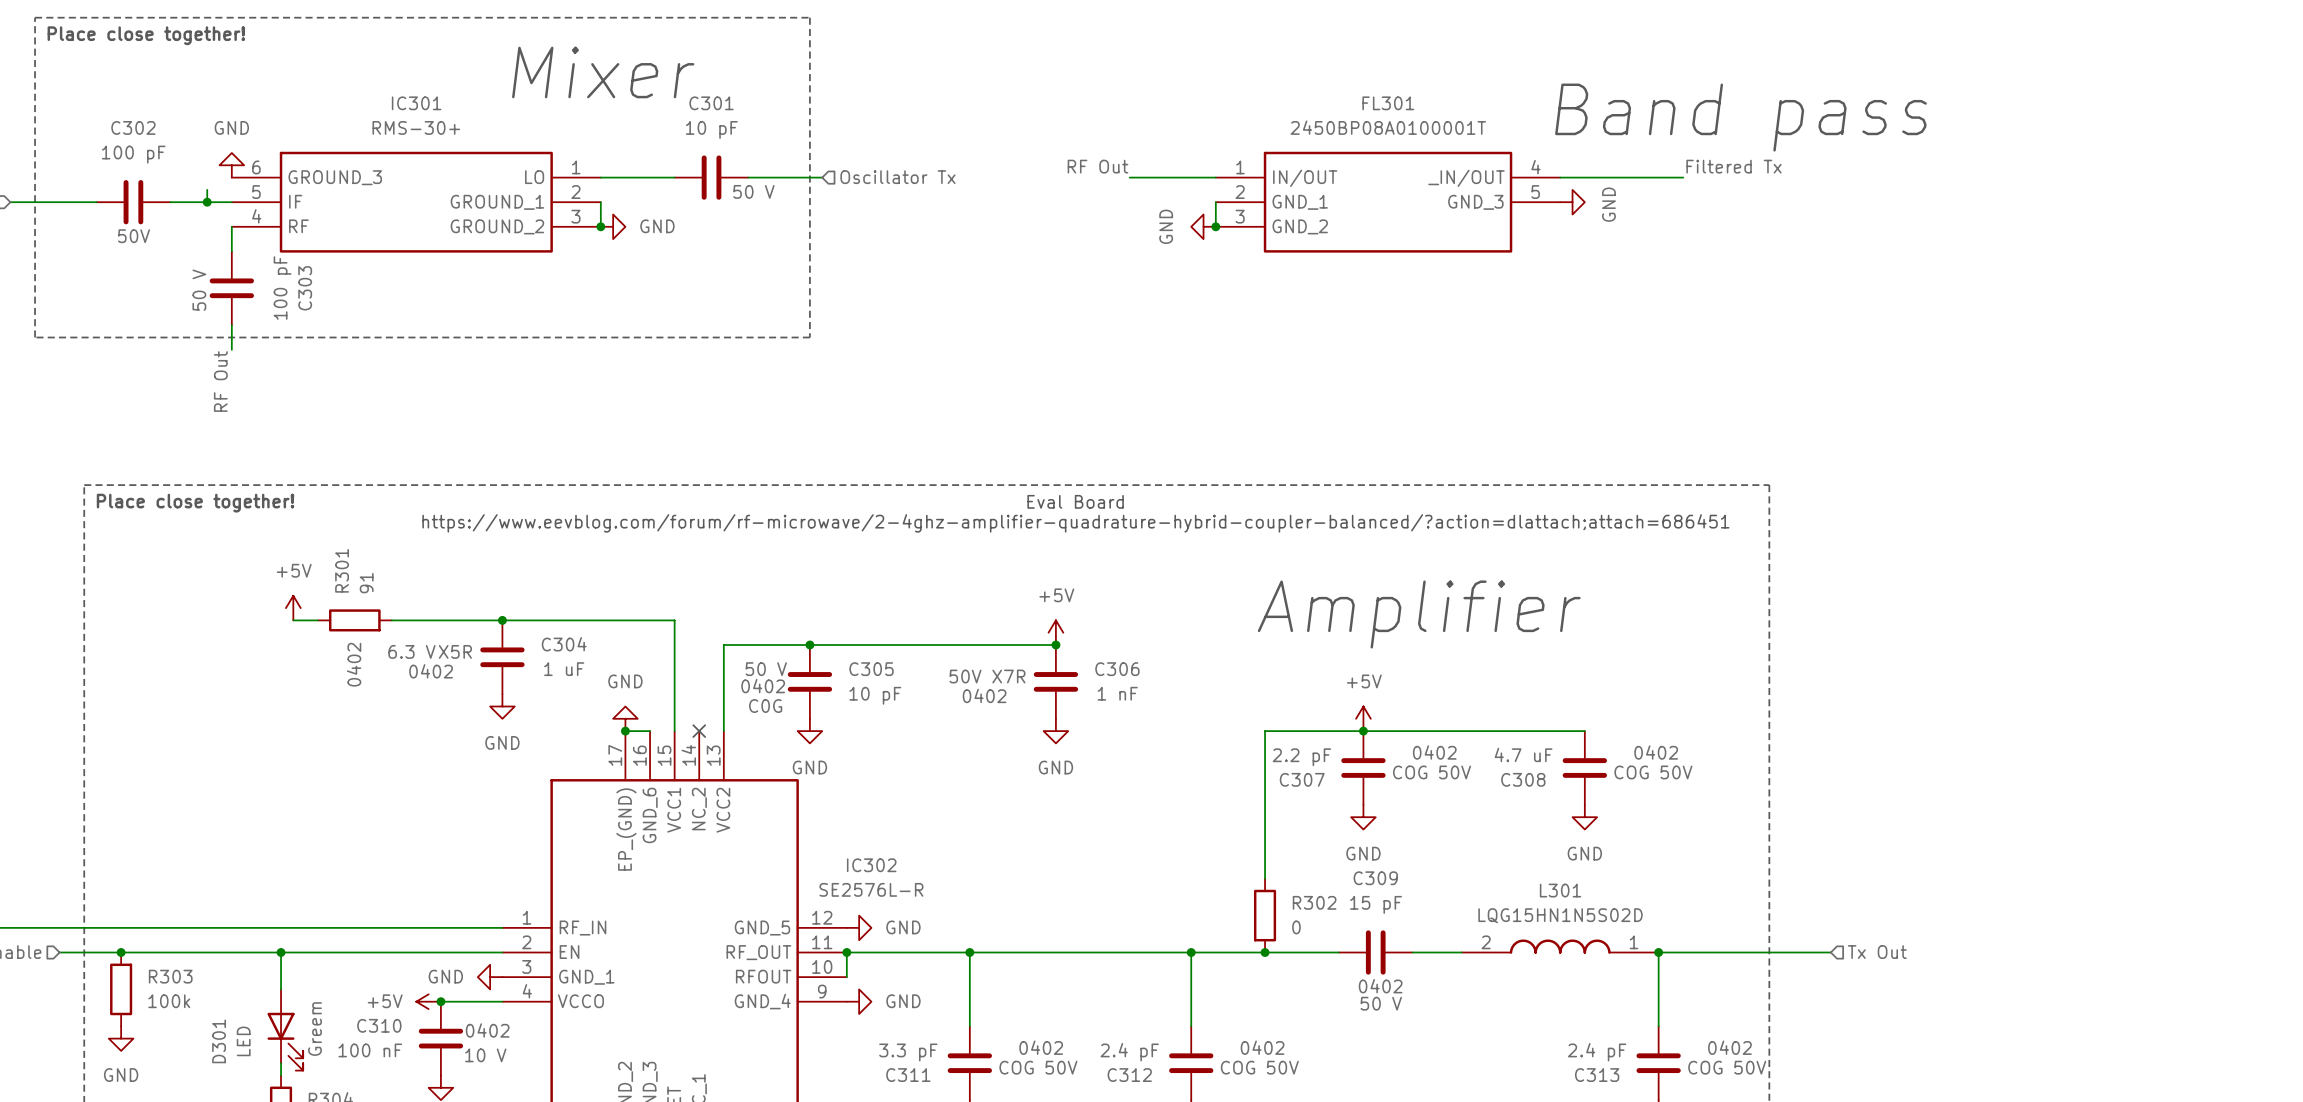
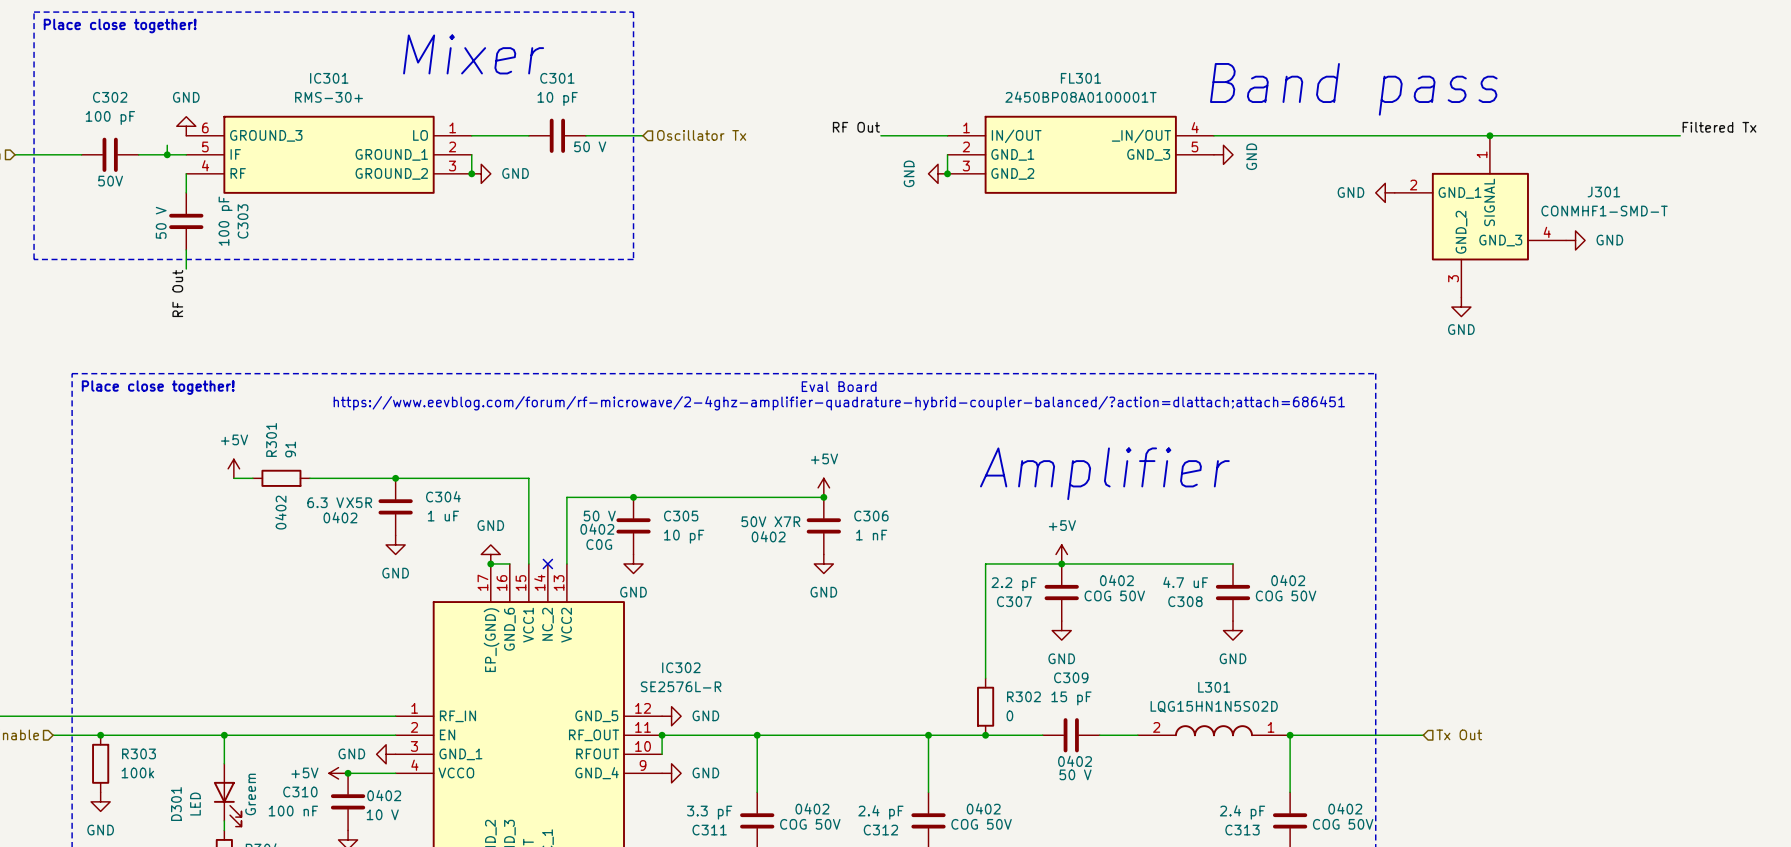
label: Filtered Tx (1733, 166) -> none
label: none -> Filtered Tx (1719, 127)
wire: none -> (1309, 135) (1680, 135)
junction: none -> (1489, 135)
power symbol: none -> GND (1385, 192)
J301: none -> CONMHF1-SMD-T (1480, 216)
power symbol: none -> GND (1575, 240)
power symbol: none -> GND (1461, 307)

